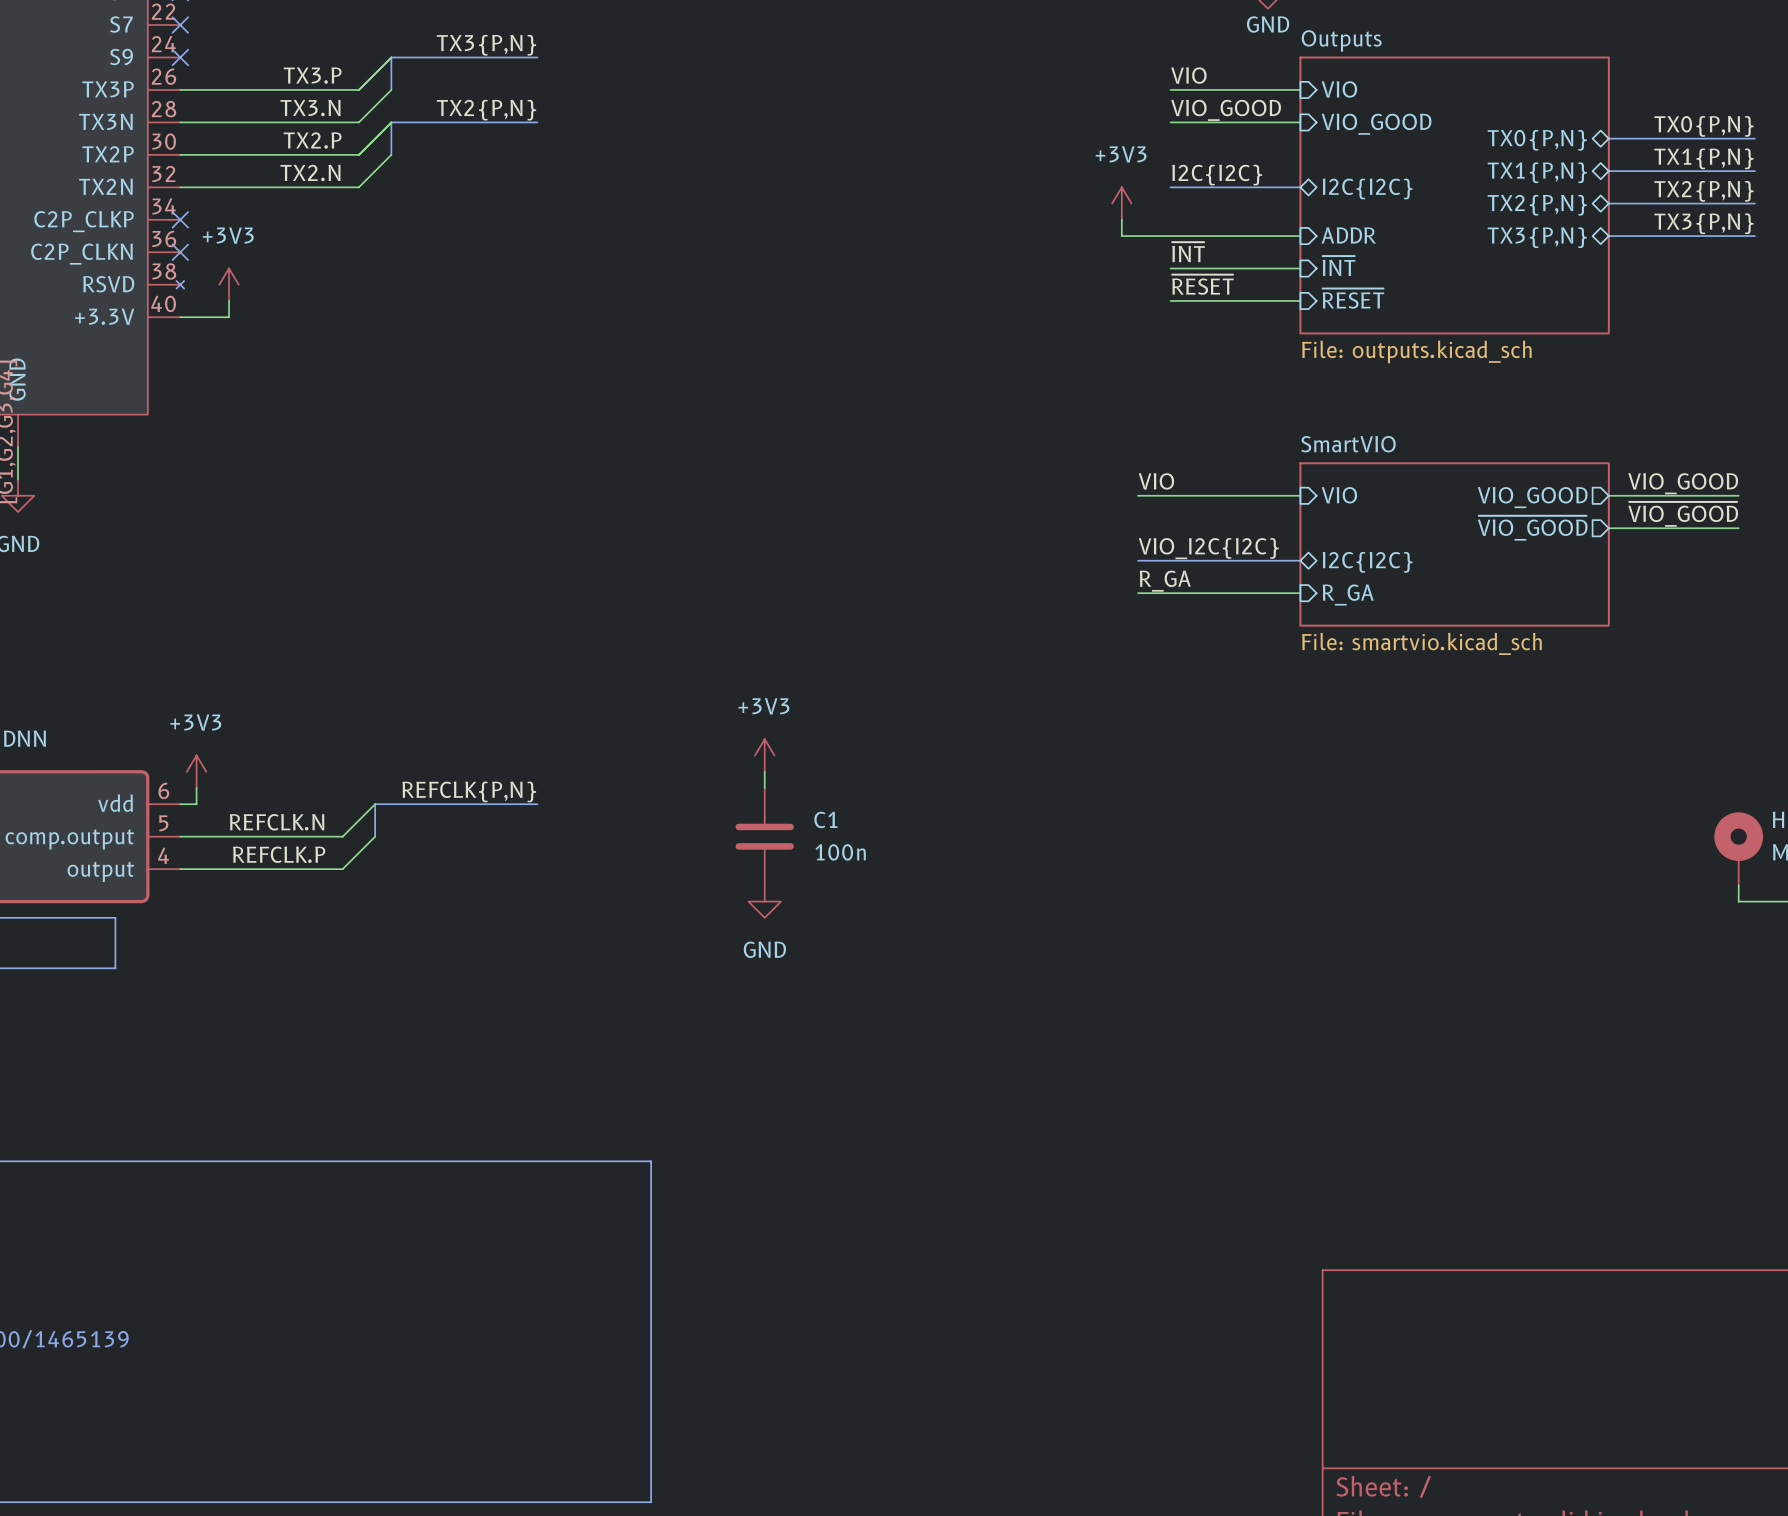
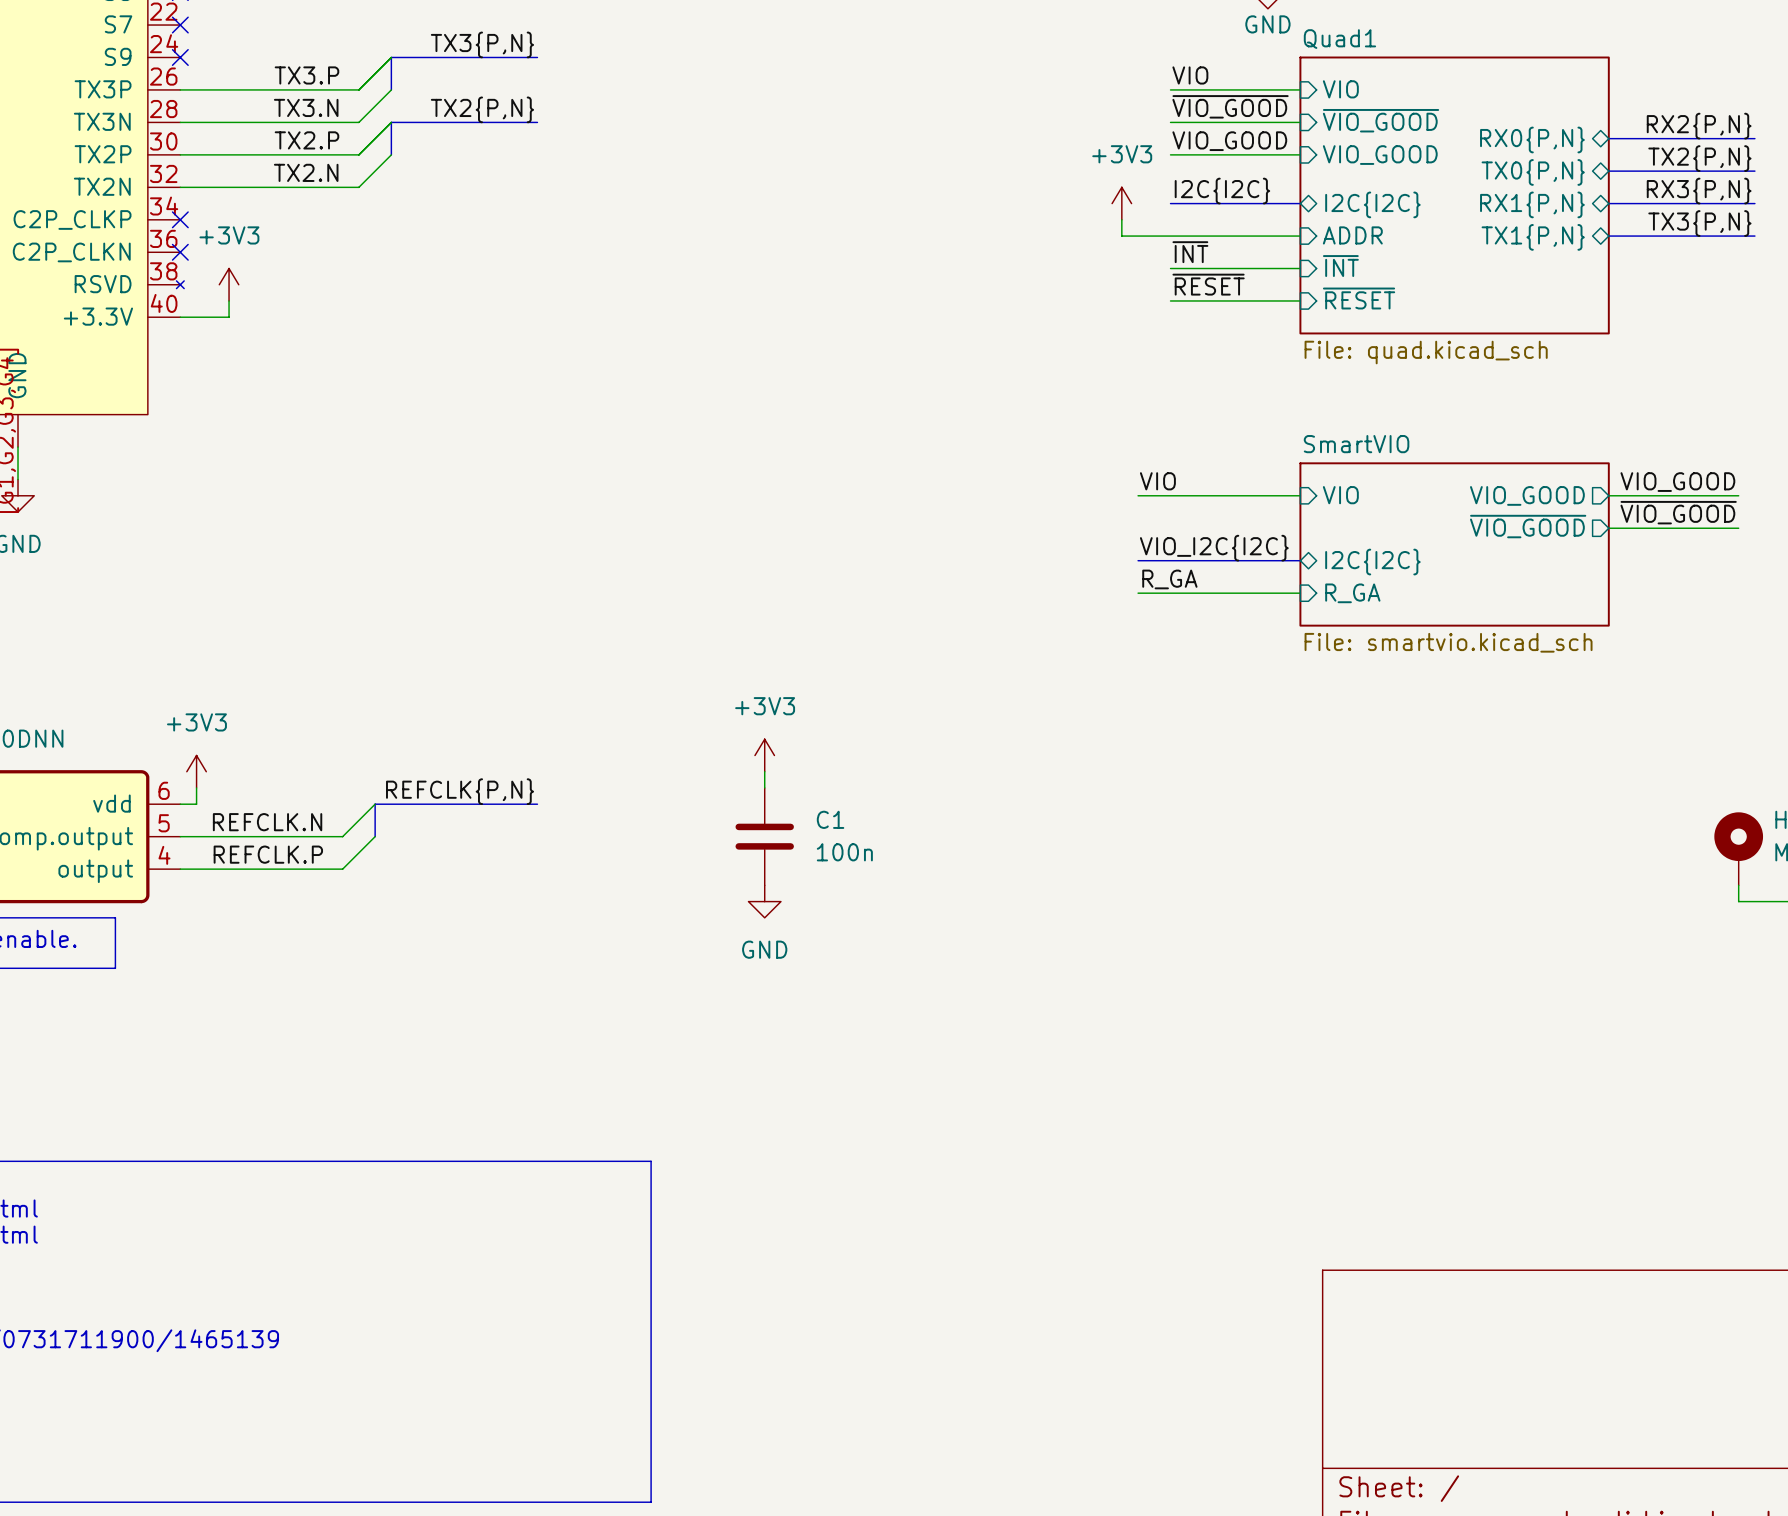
sheet Outputs name: Outputs (1341, 40) -> Quad1 (1339, 39)
label: VIO_GOOD (1226, 110) -> ~{VIO_GOOD} (1230, 106)
sheet pin: VIO_GOOD (1376, 124) -> ~{VIO_GOOD} (1381, 120)
label: TX0{P,N} (1703, 126) -> RX2{P,N} (1699, 126)
sheet pin: TX0{P,N} (1537, 140) -> RX0{P,N} (1532, 139)
label: none -> VIO_GOOD (1229, 141)
wire: none -> (1170, 154) (1300, 154)
sheet pin: none -> VIO_GOOD (1380, 155)
label: TX1{P,N} (1703, 158) -> TX2{P,N} (1699, 158)
sheet pin: TX1{P,N} (1537, 172) -> TX0{P,N} (1533, 172)
label position: I2C{I2C} (1217, 175) -> I2C{I2C} (1222, 191)
bus: (1170, 187) (1300, 187) -> (1170, 203) (1300, 203)
sheet pin position: I2C{I2C} (1367, 188) -> I2C{I2C} (1372, 204)
label: TX2{P,N} (1703, 191) -> RX3{P,N} (1699, 191)
sheet pin: TX2{P,N} (1537, 205) -> RX1{P,N} (1532, 204)
sheet pin: TX3{P,N} (1537, 237) -> TX1{P,N} (1533, 237)
sheet Outputs value: File: outputs.kicad_sch (1416, 351) -> File: quad.kicad_sch (1426, 352)

